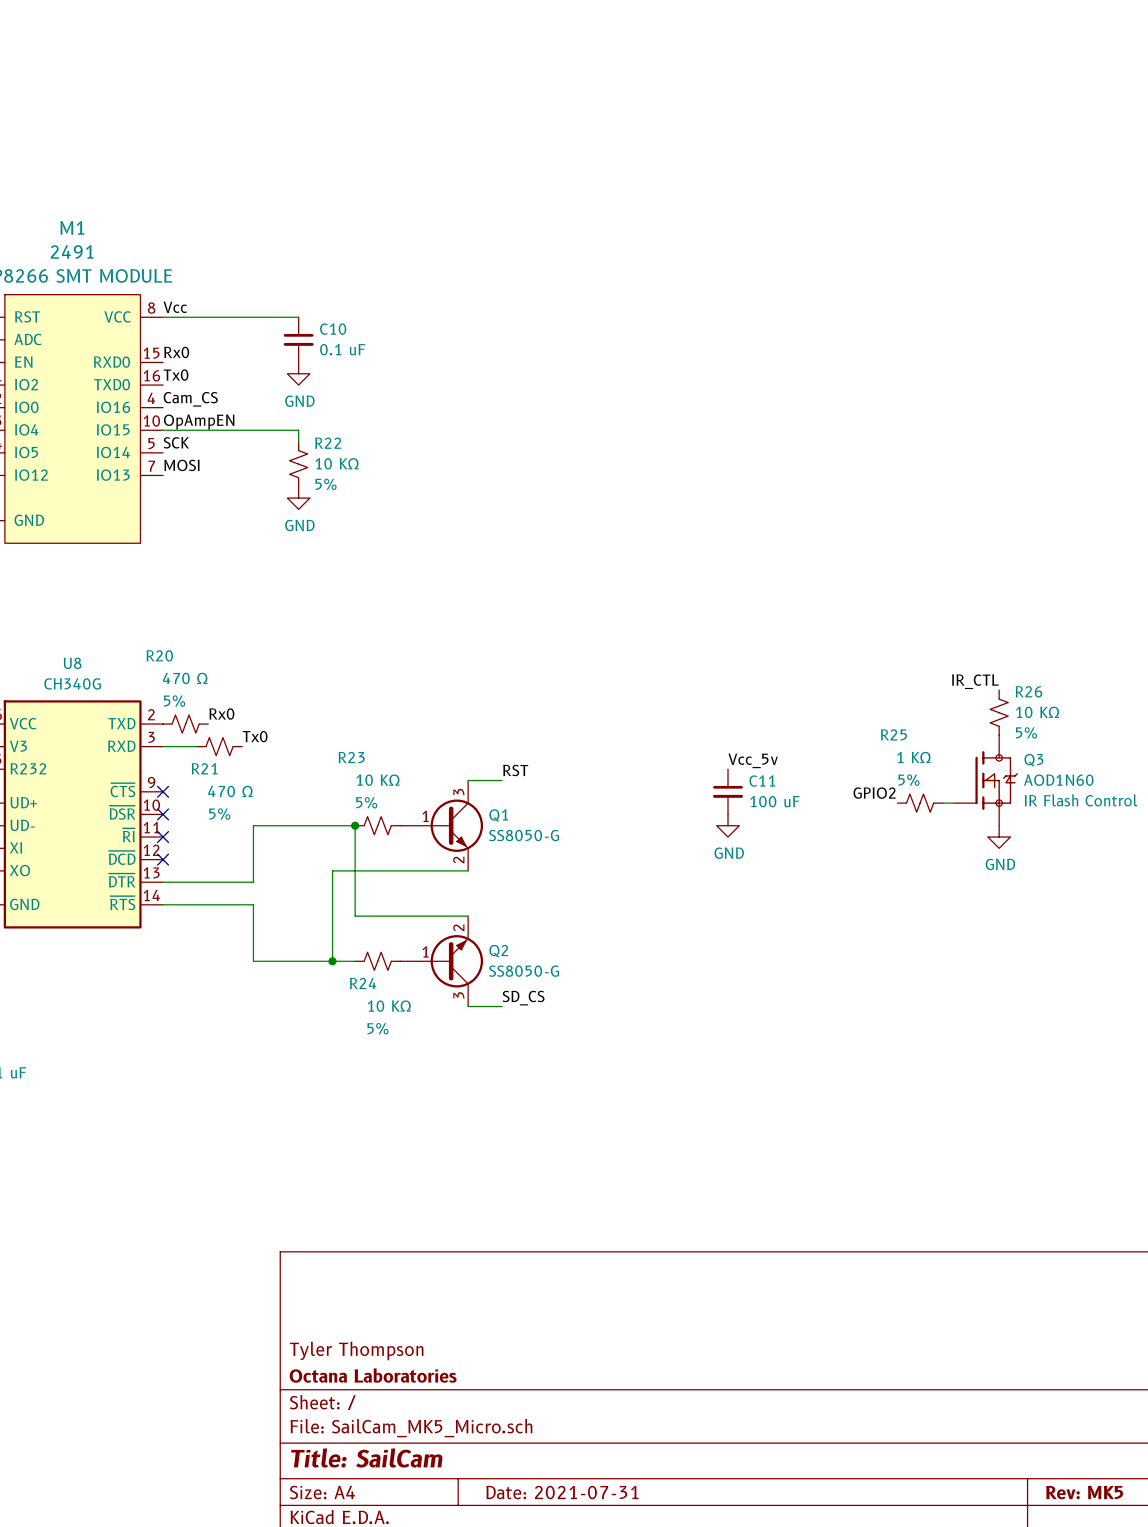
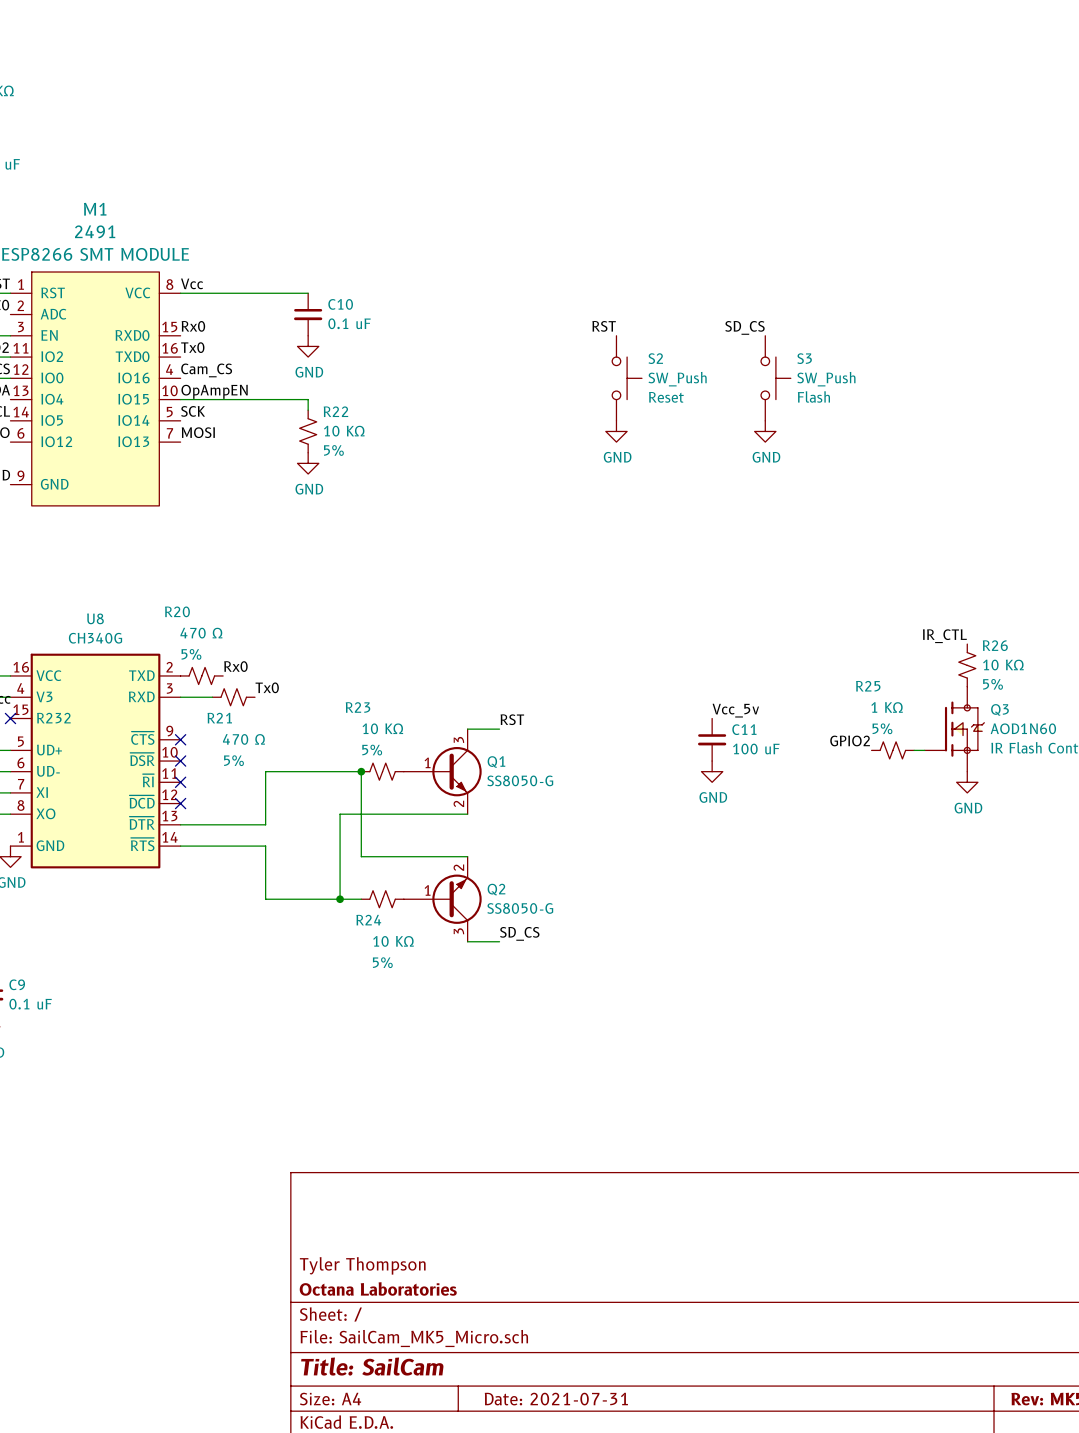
label: none -> RST (604, 326)
label: none -> SD_CS (744, 327)
S2: none -> SW_Push (627, 378)
S3: none -> SW_Push (775, 378)
power symbol: none -> GND (616, 431)
power symbol: none -> GND (765, 431)

